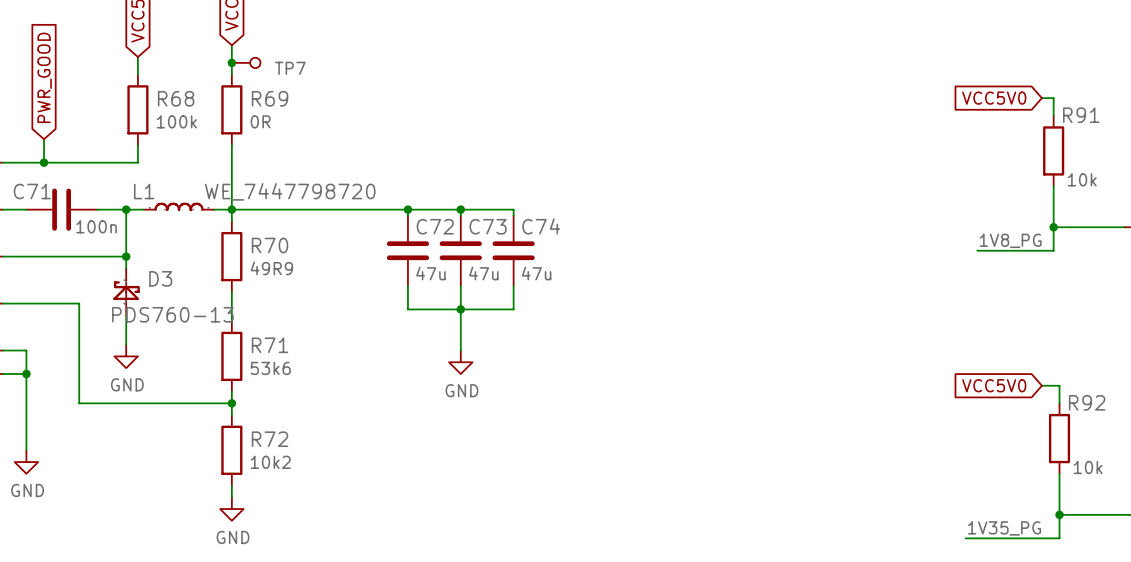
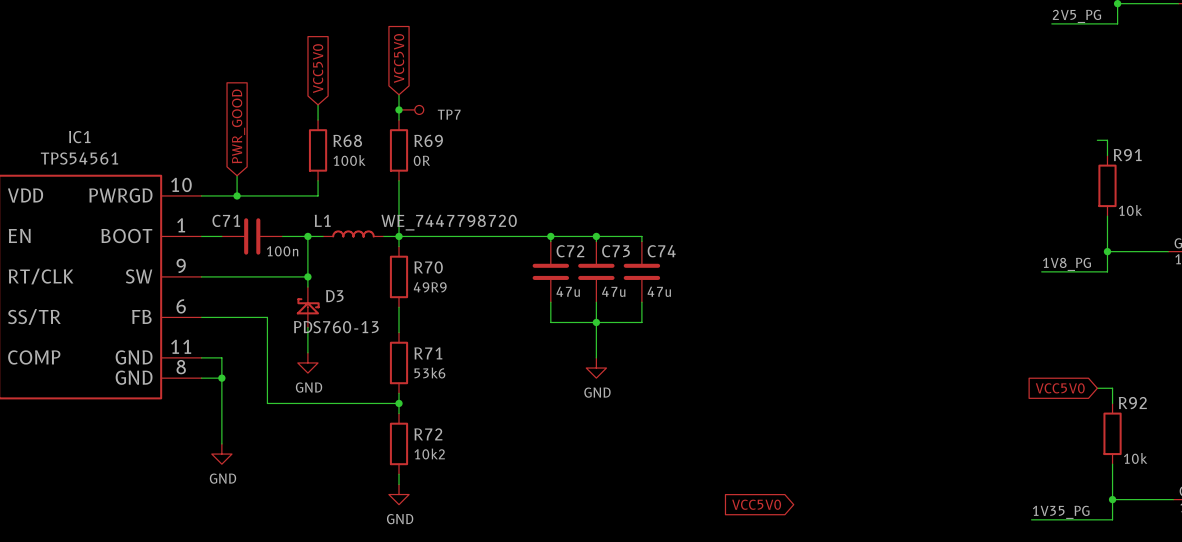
global label: VCC5V0 (994, 98) -> none
global label: none -> VCC5V0 (756, 504)

